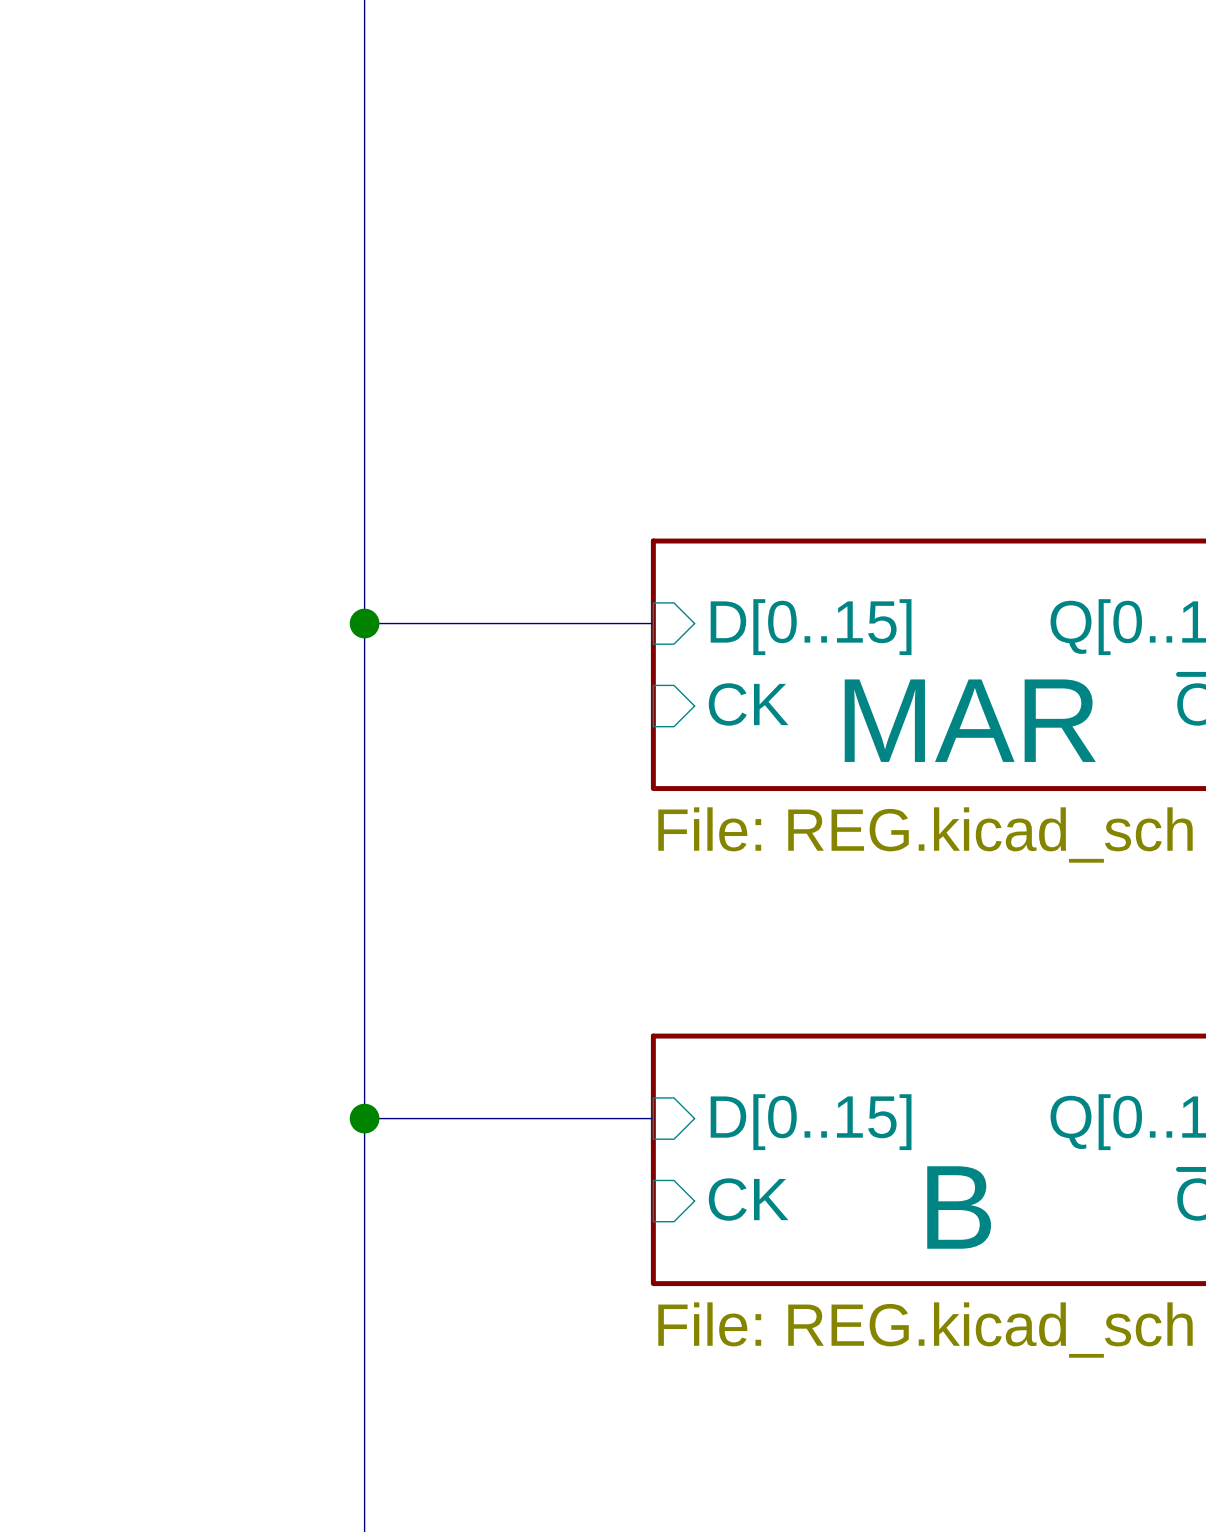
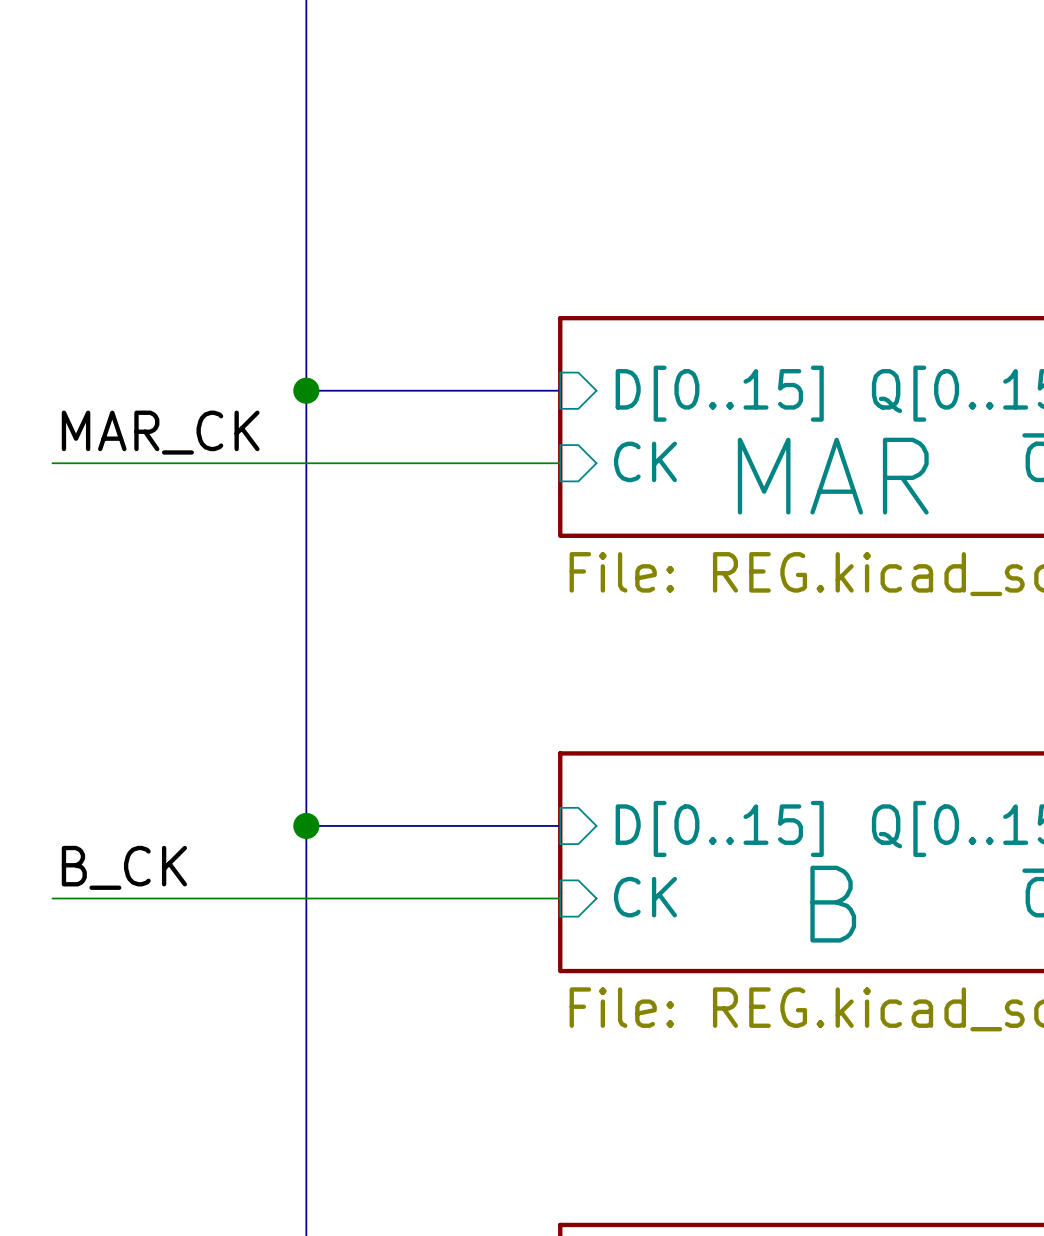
label: none -> MAR_CK (160, 432)
wire: none -> (52, 463) (560, 463)
label: none -> B_CK (124, 867)
wire: none -> (52, 898) (560, 898)

